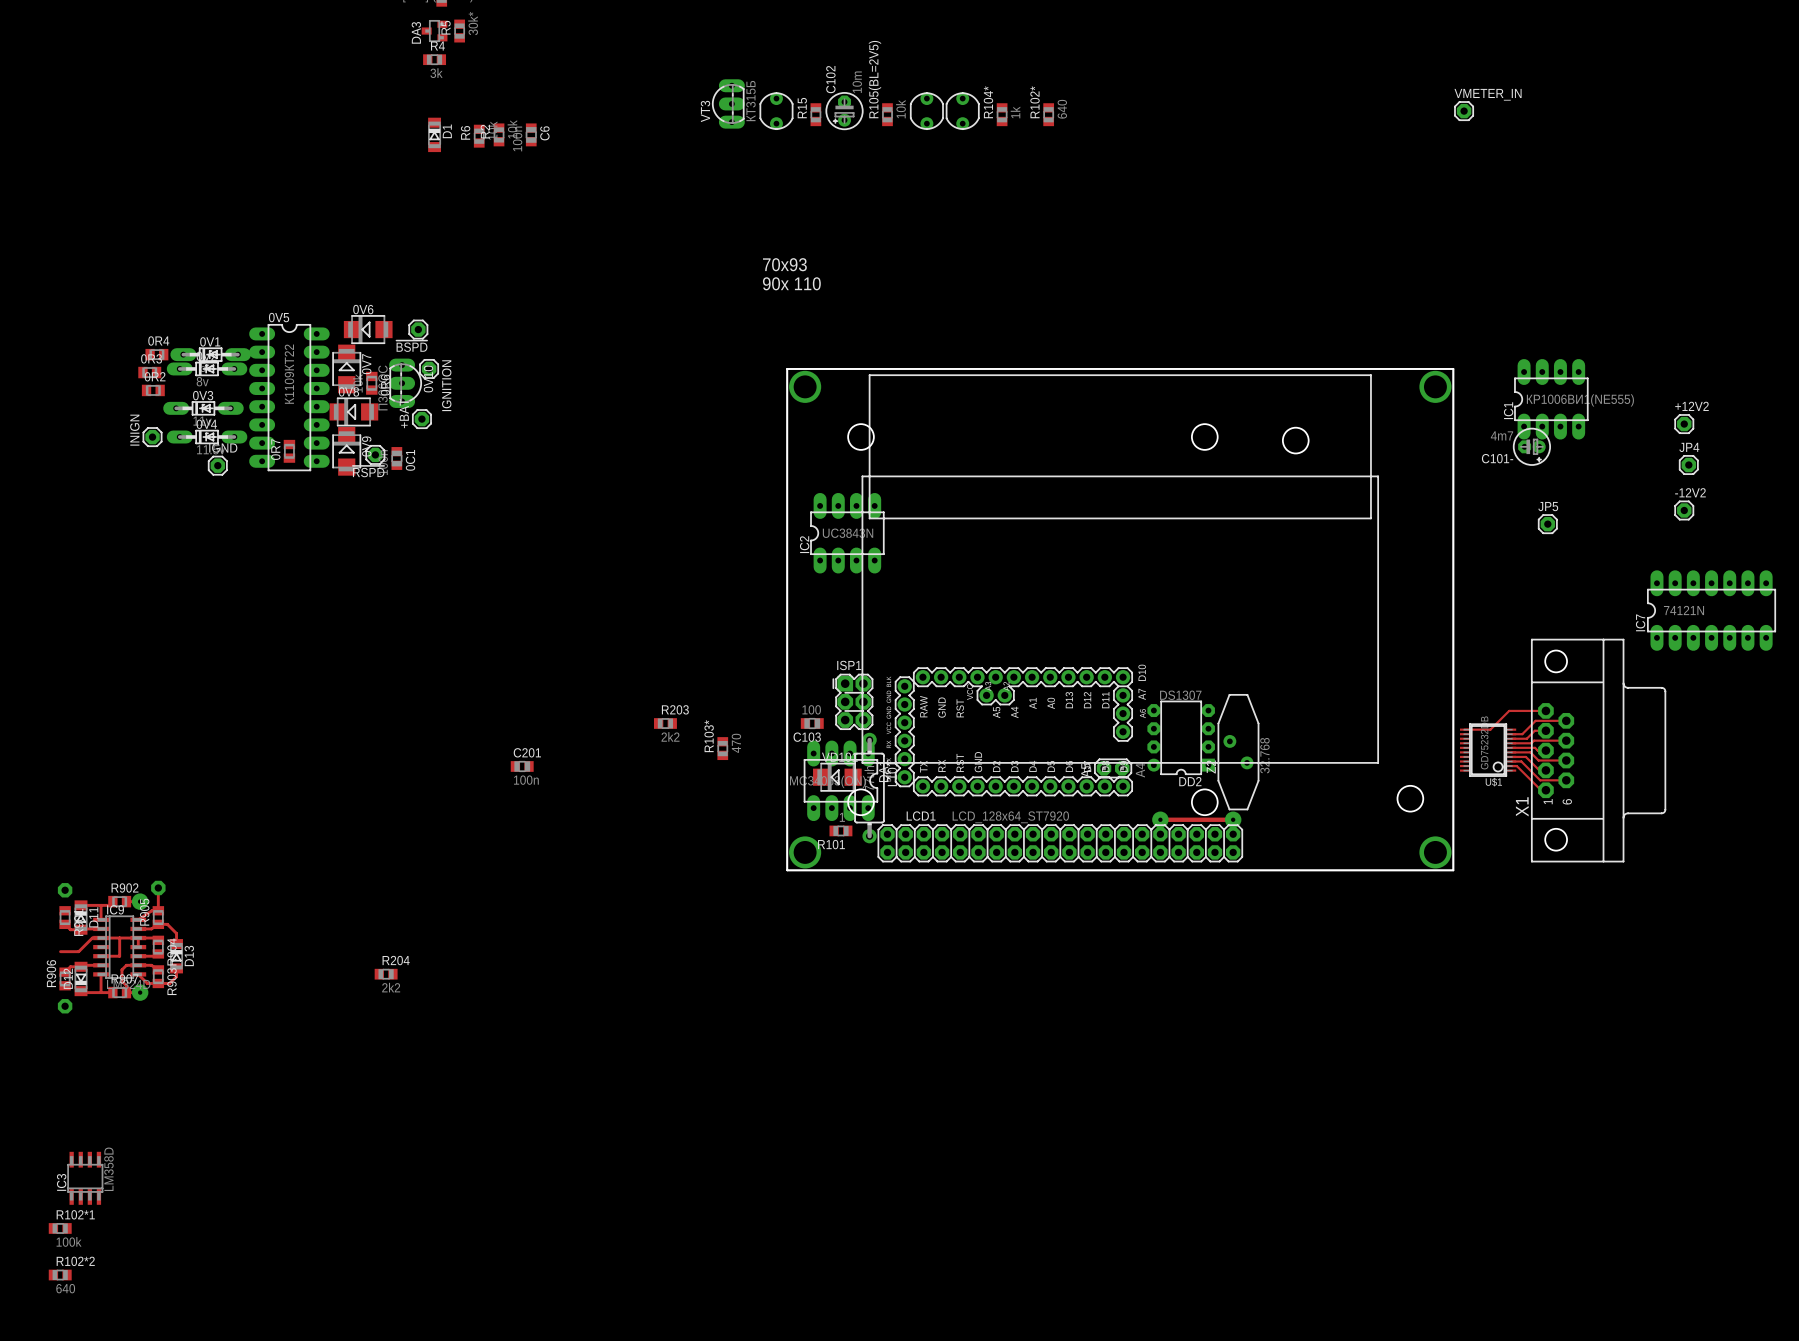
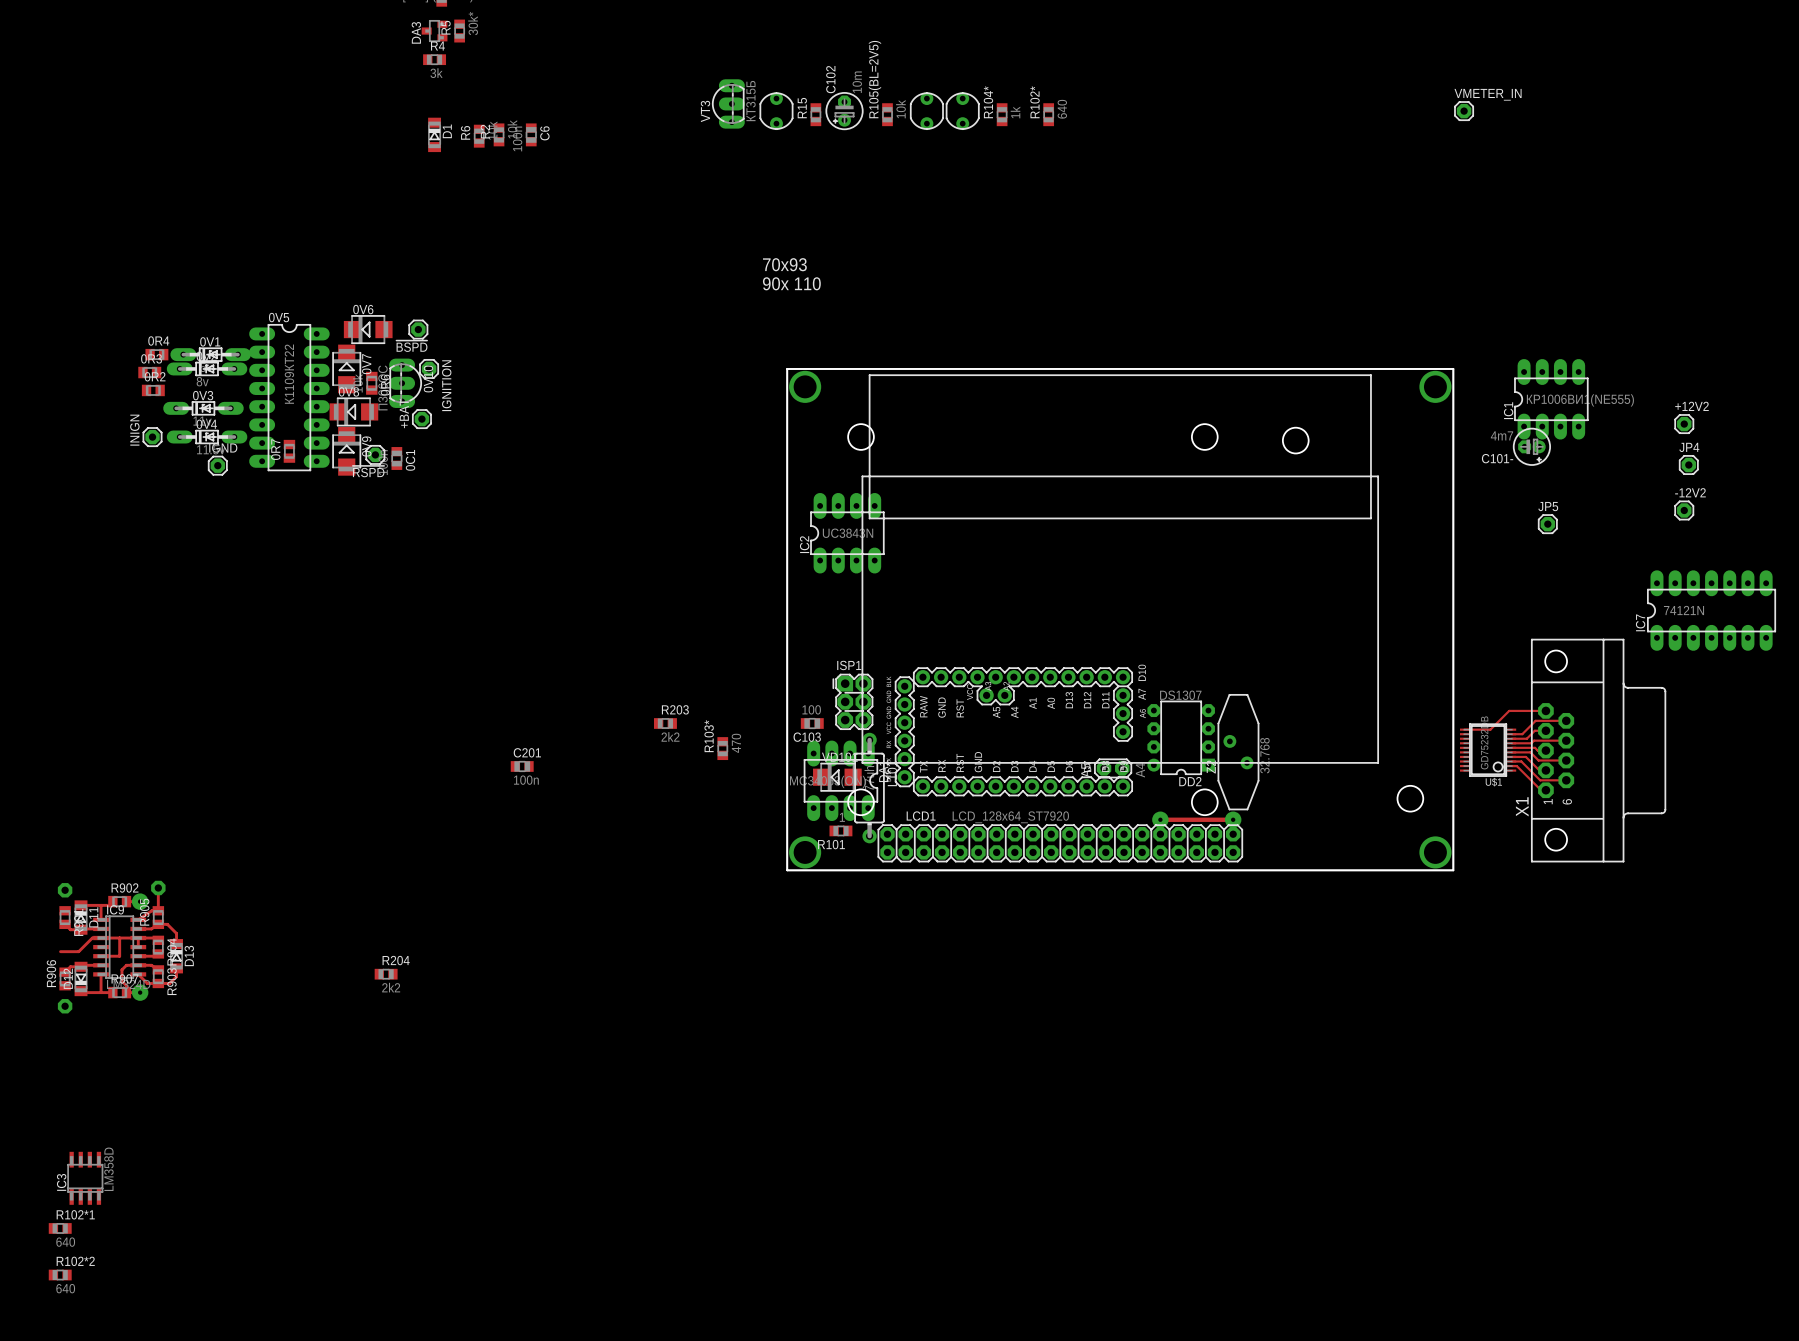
R102*1 value: 100k (69, 1241) -> 640 (65, 1242)

